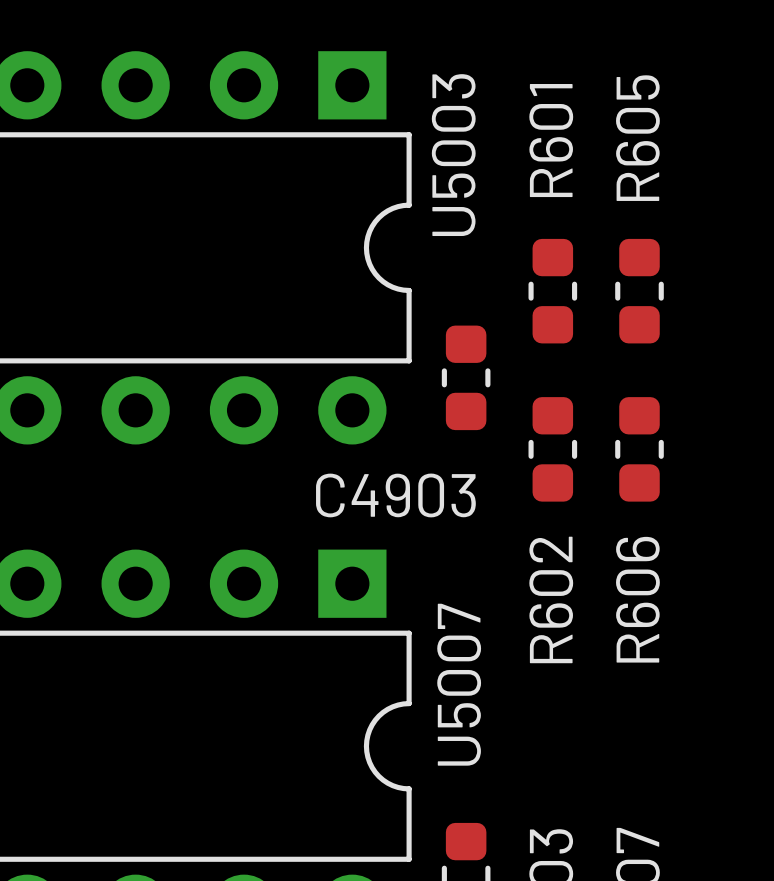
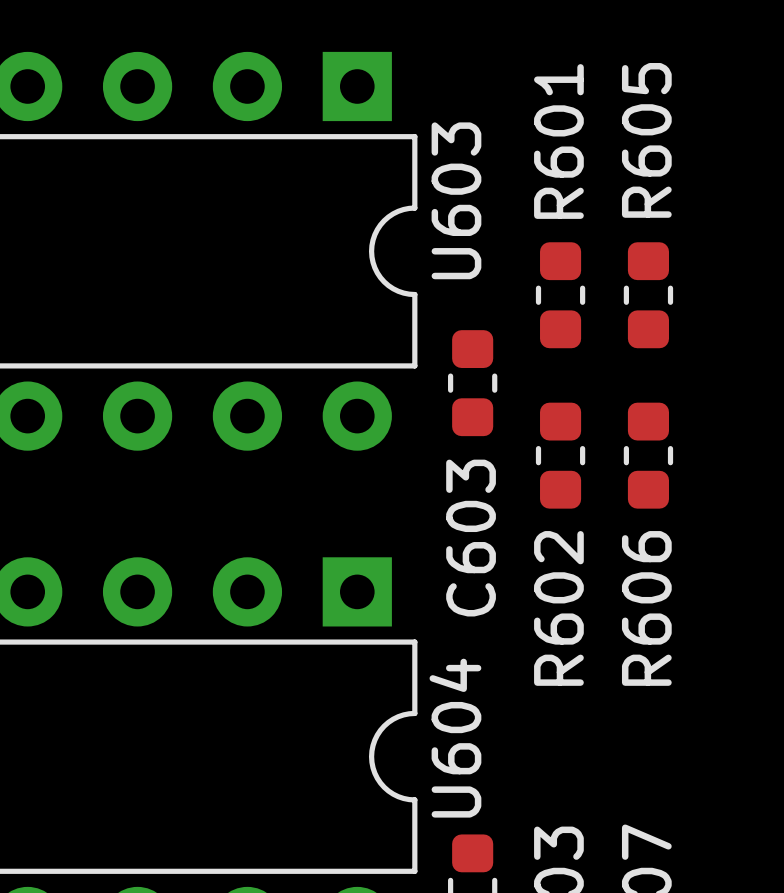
U5003 name: U5003 (453, 155) -> U603 (456, 200)
C4903 name: C4903 (395, 495) -> C603 (471, 538)
U5007 name: U5007 (459, 684) -> U604 (455, 738)

